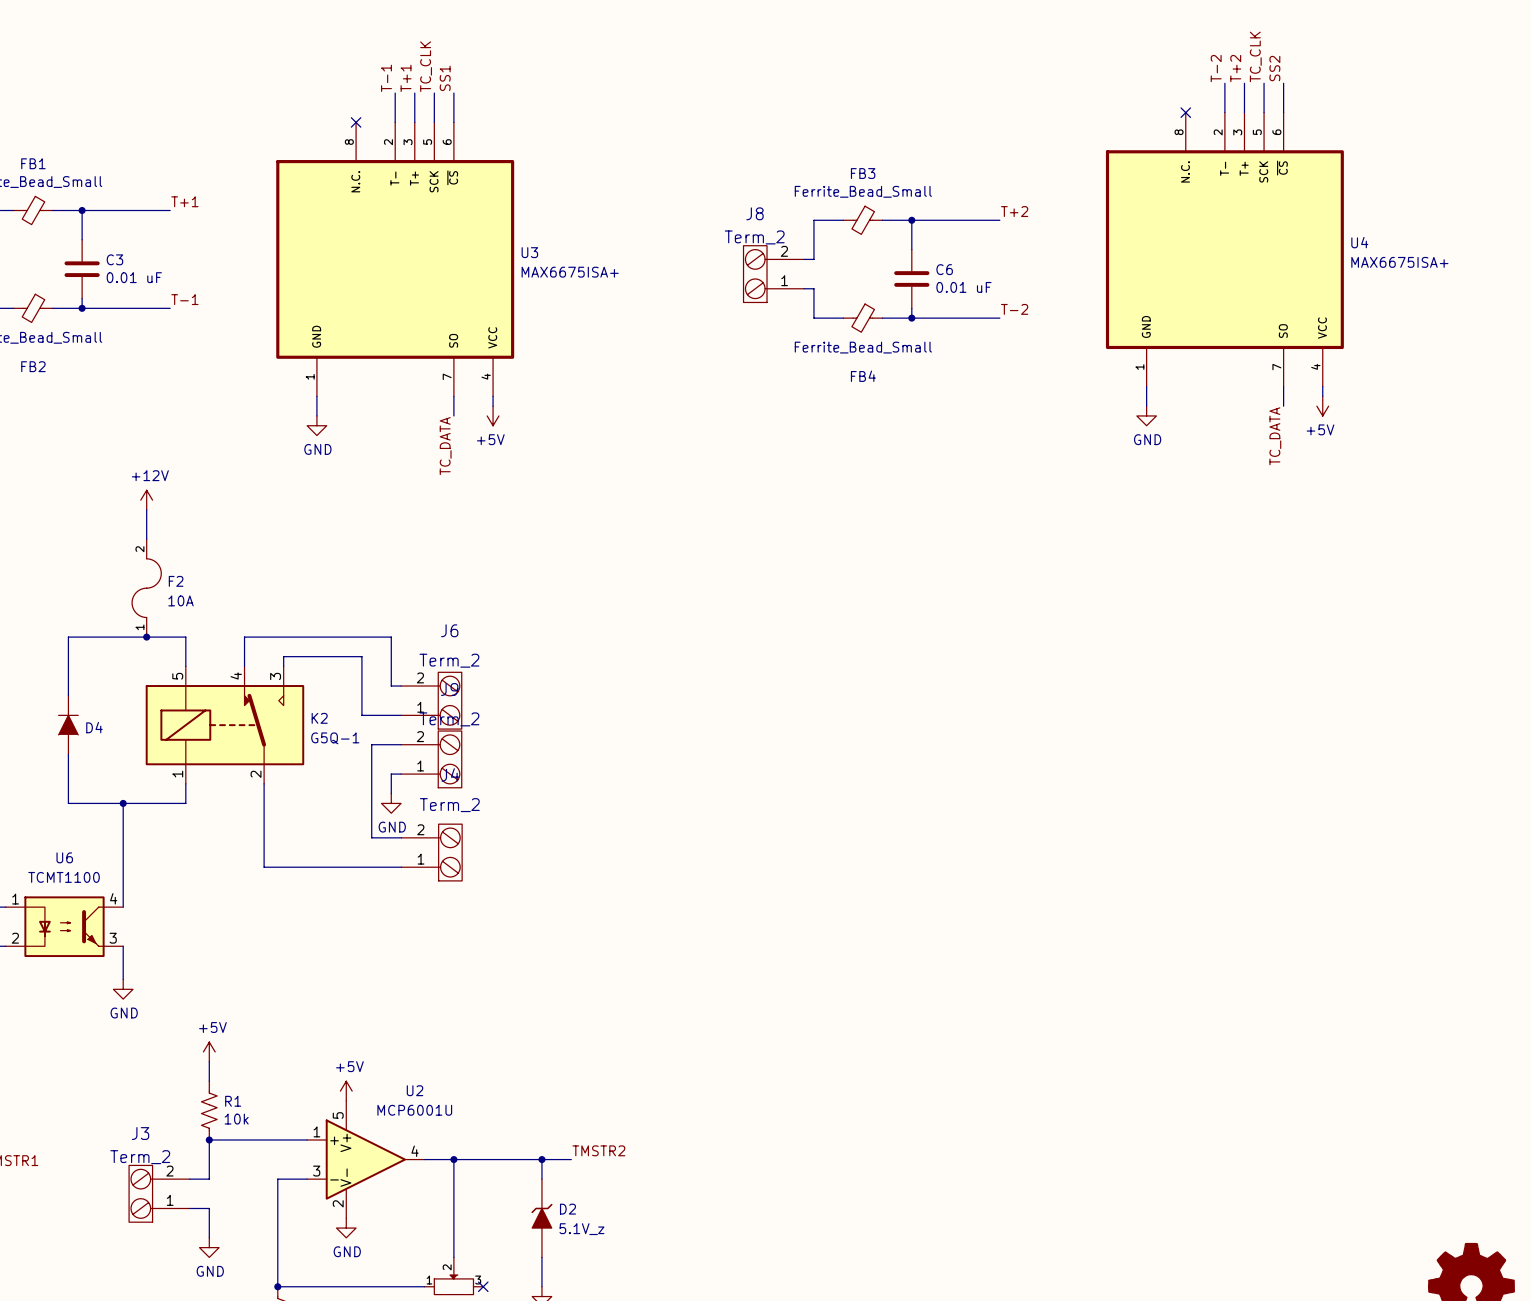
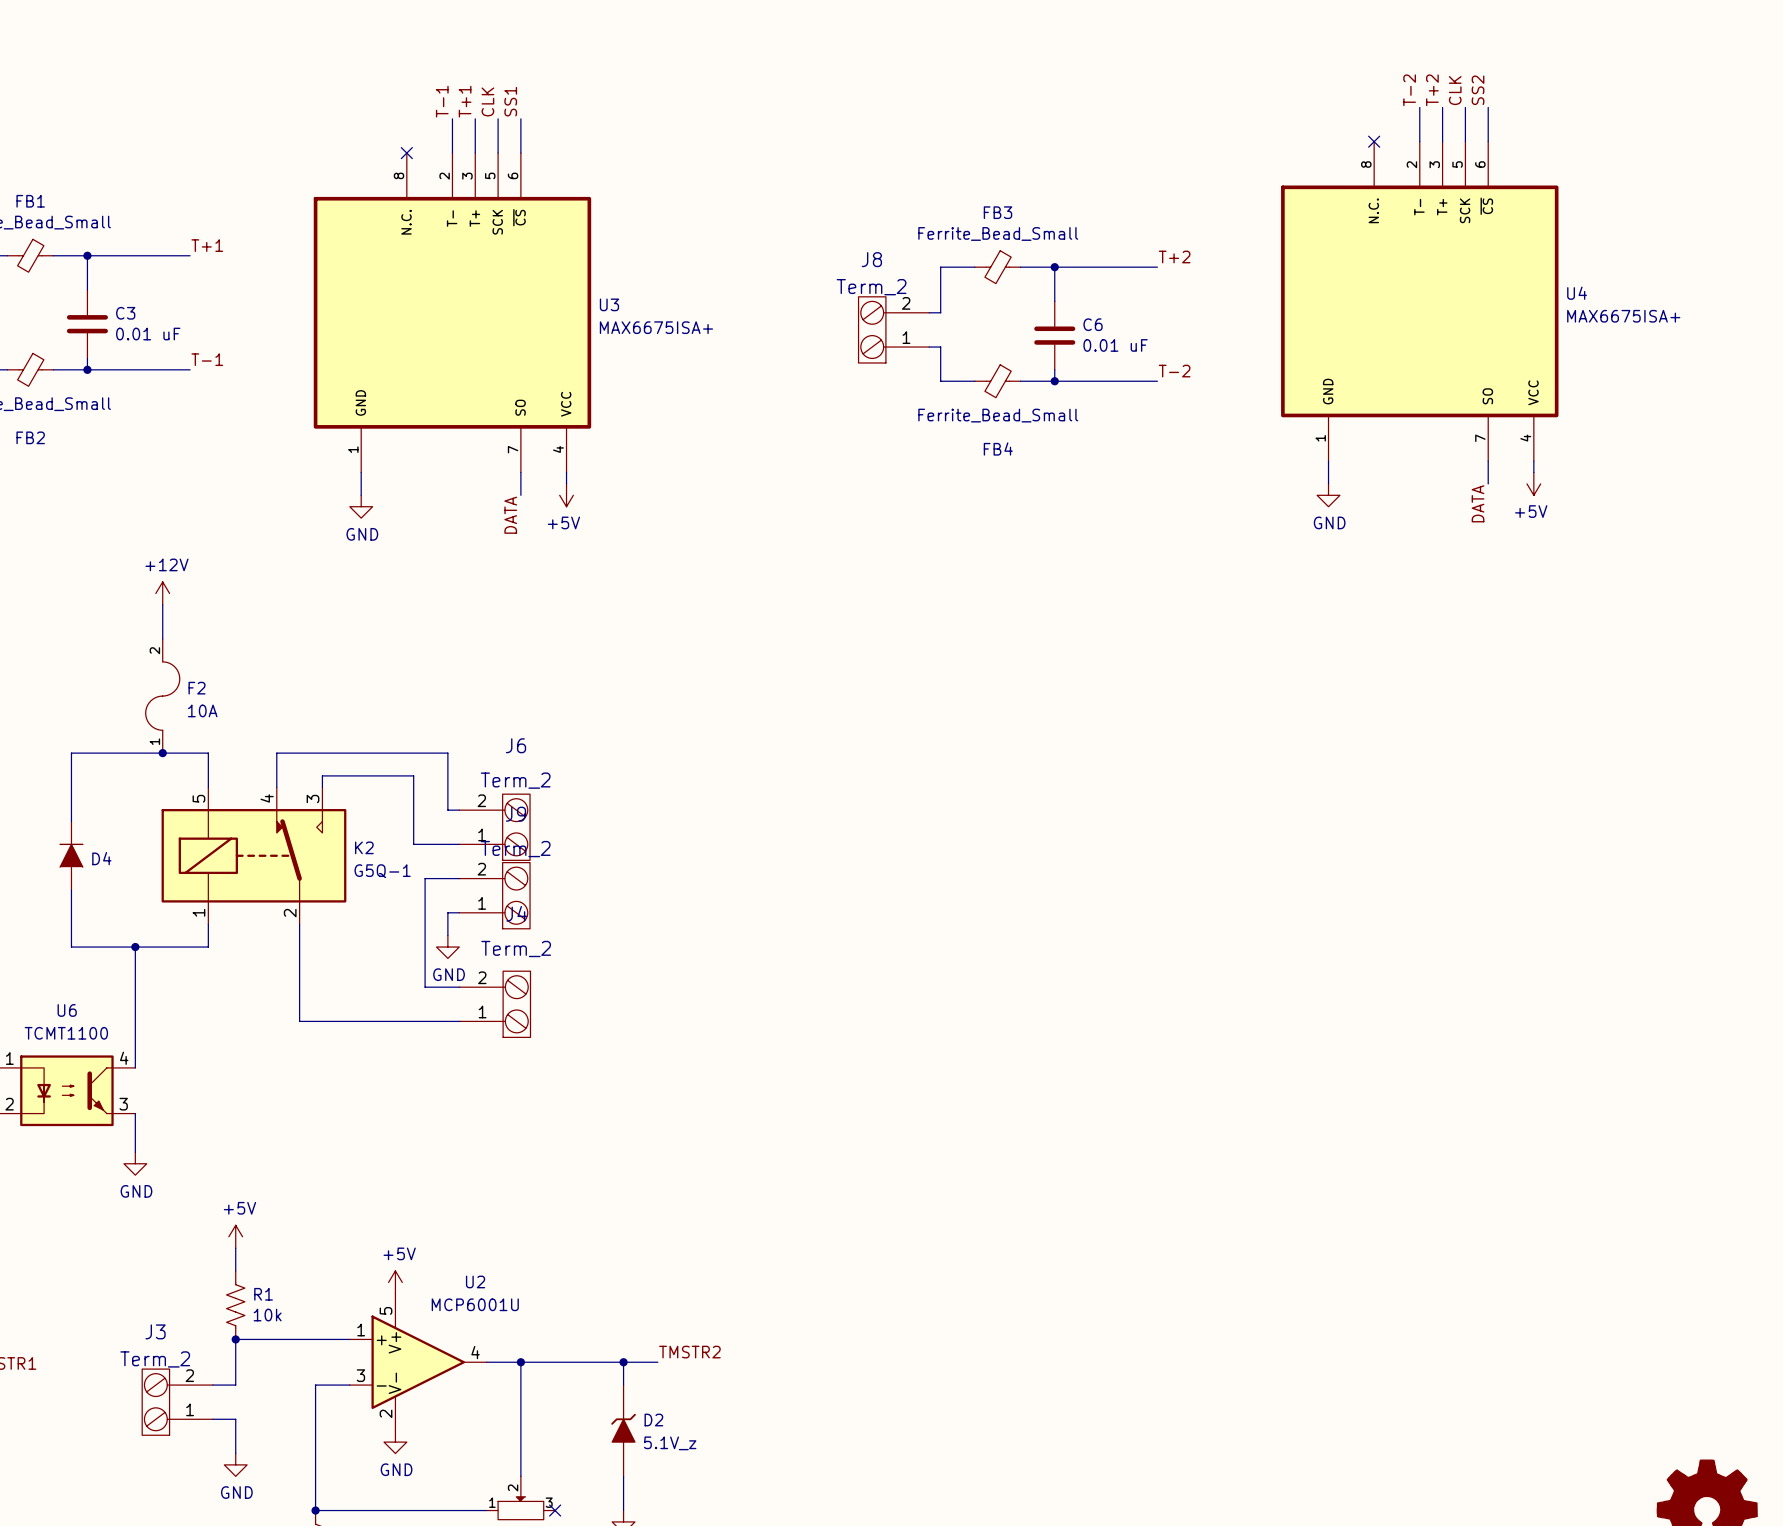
label: TC_CLK (1255, 56) -> CLK (1455, 90)
label: TC_CLK (426, 66) -> CLK (487, 101)
label: TC_DATA (1275, 436) -> DATA (1478, 503)
label: TC_DATA (445, 446) -> DATA (510, 515)

